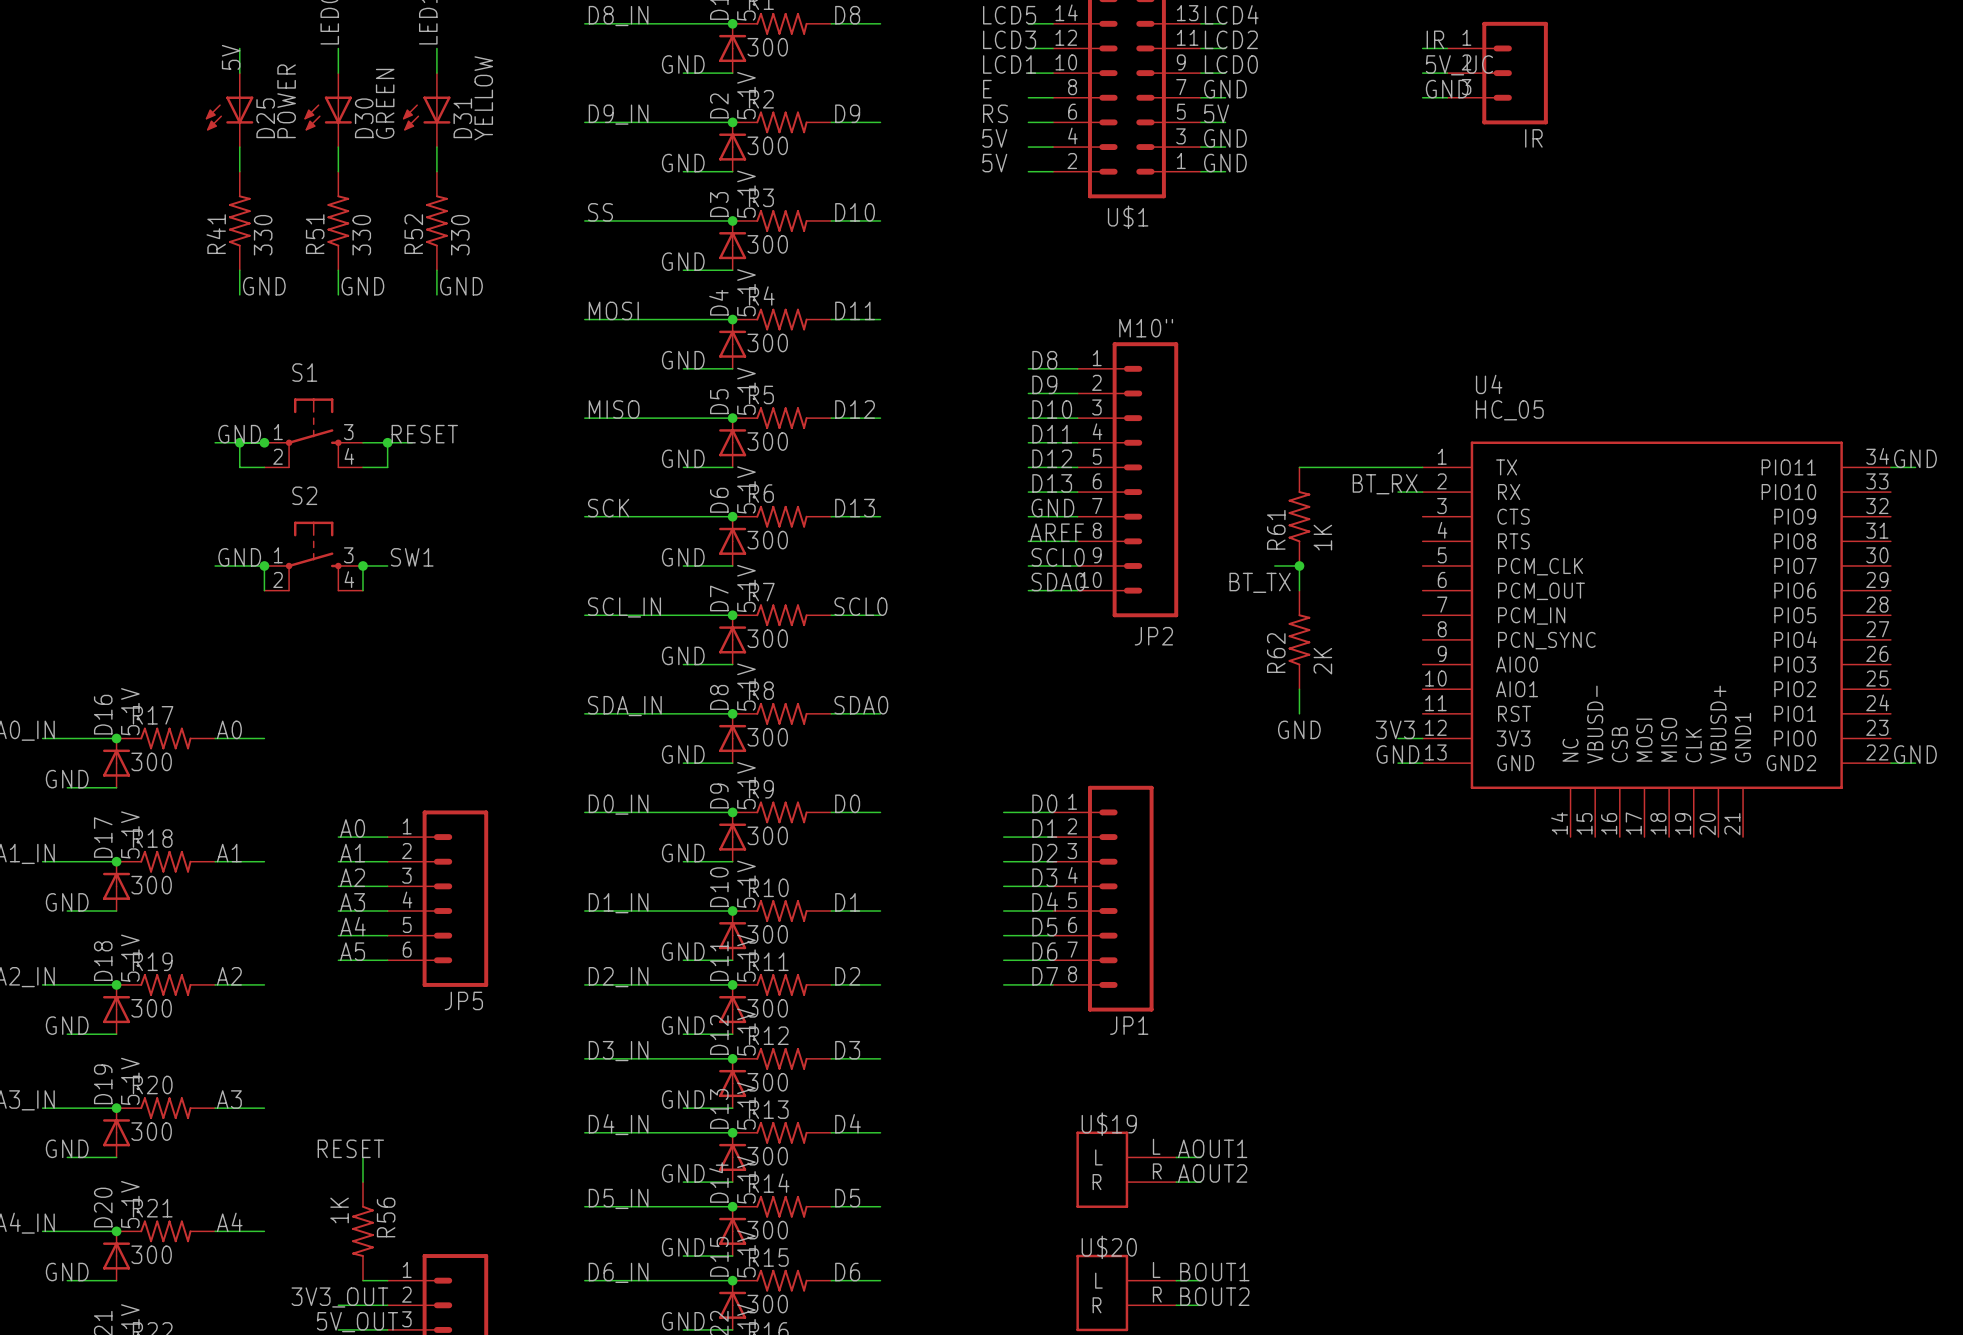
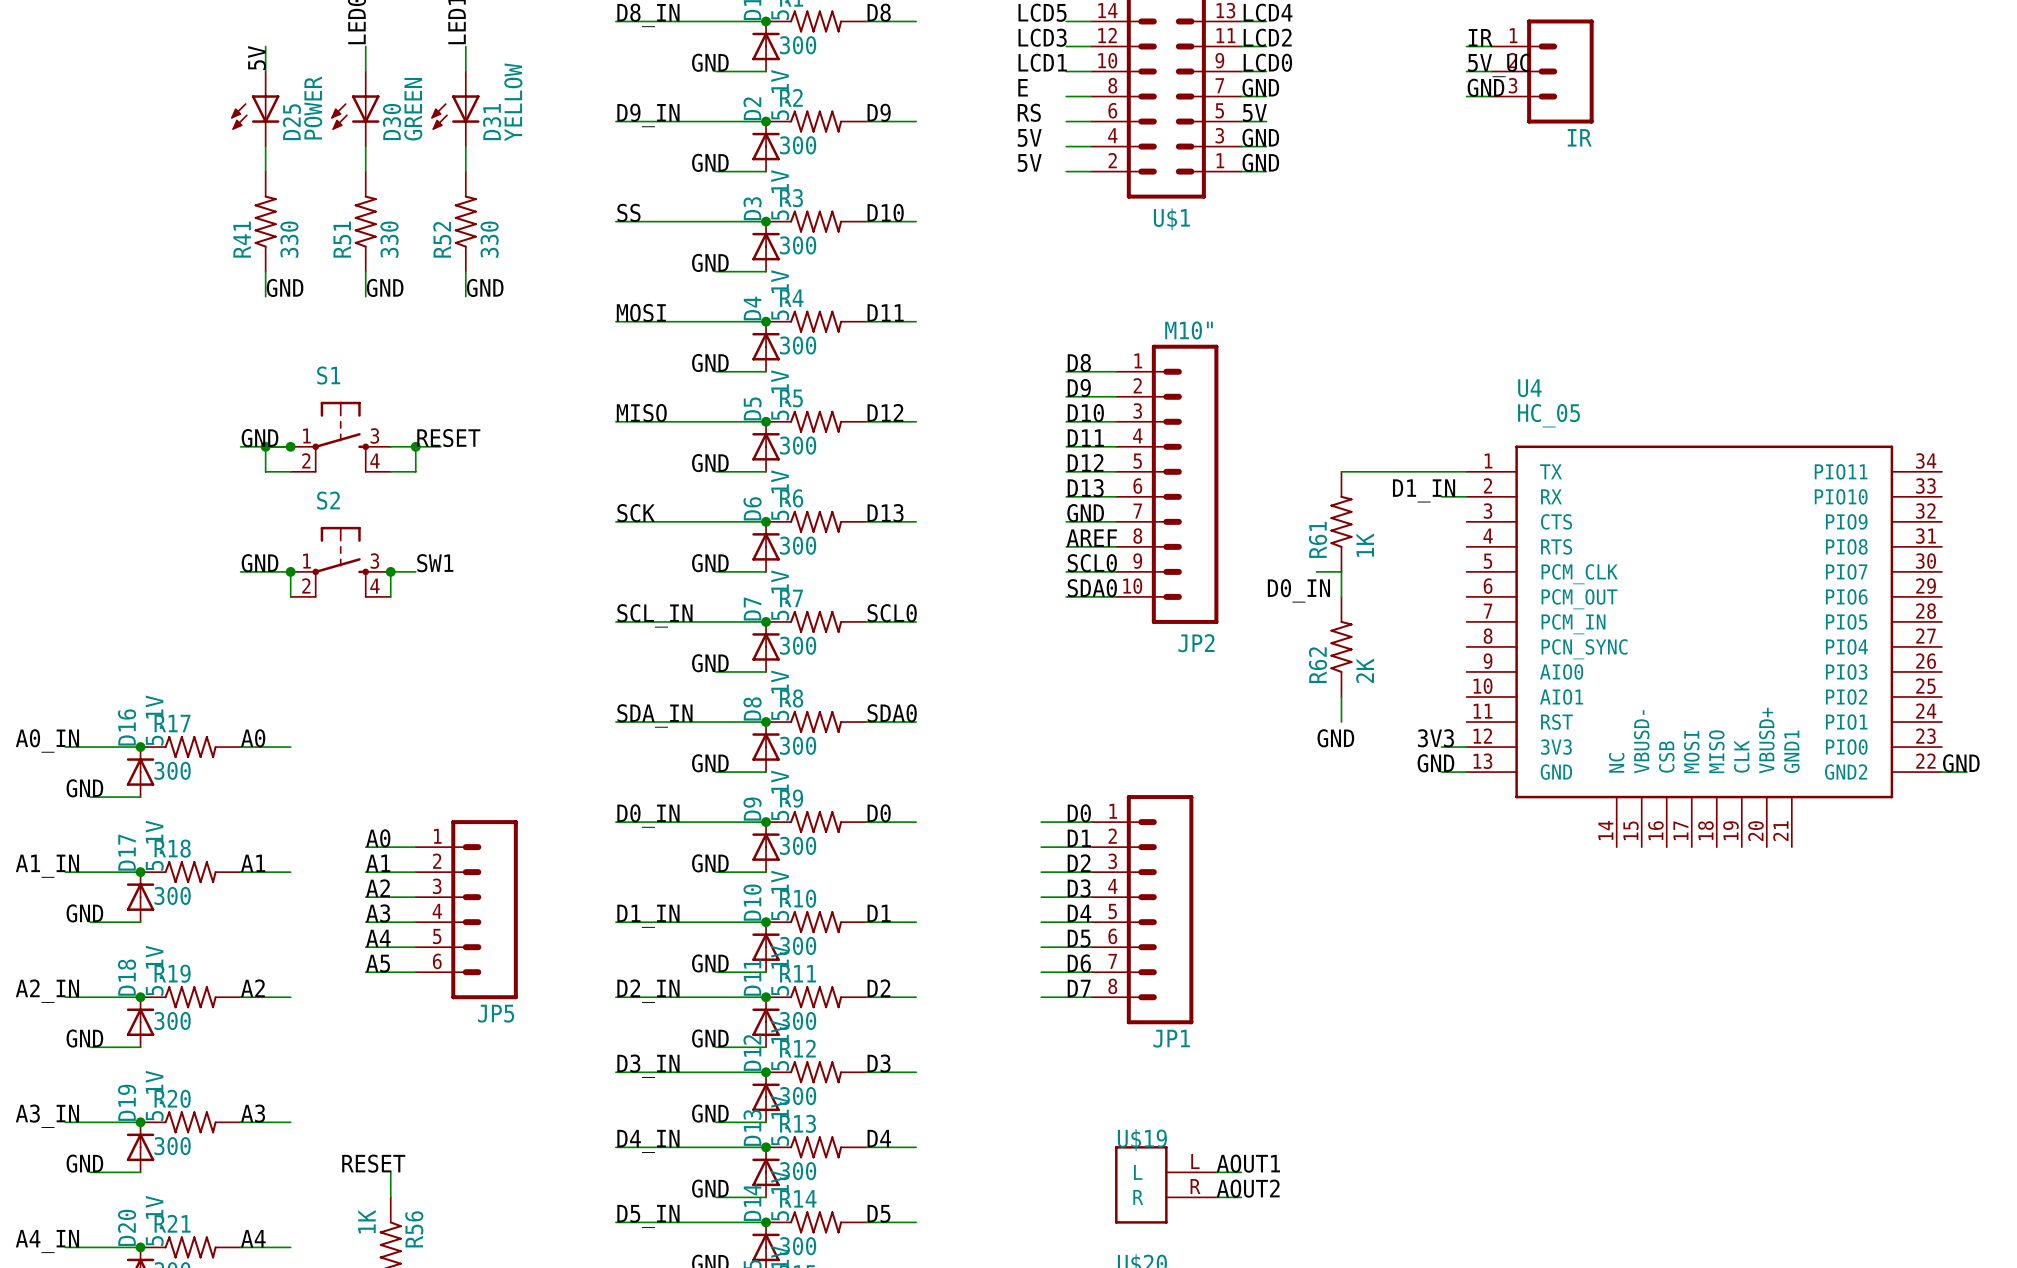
label: GND (1915, 458) -> none
wire: (1890, 467) (1915, 467) -> none
label: BT_RX (1385, 484) -> D1_IN (1424, 490)
junction: (1299, 565) -> none
label: BT_TX (1260, 582) -> D0_IN (1298, 590)

